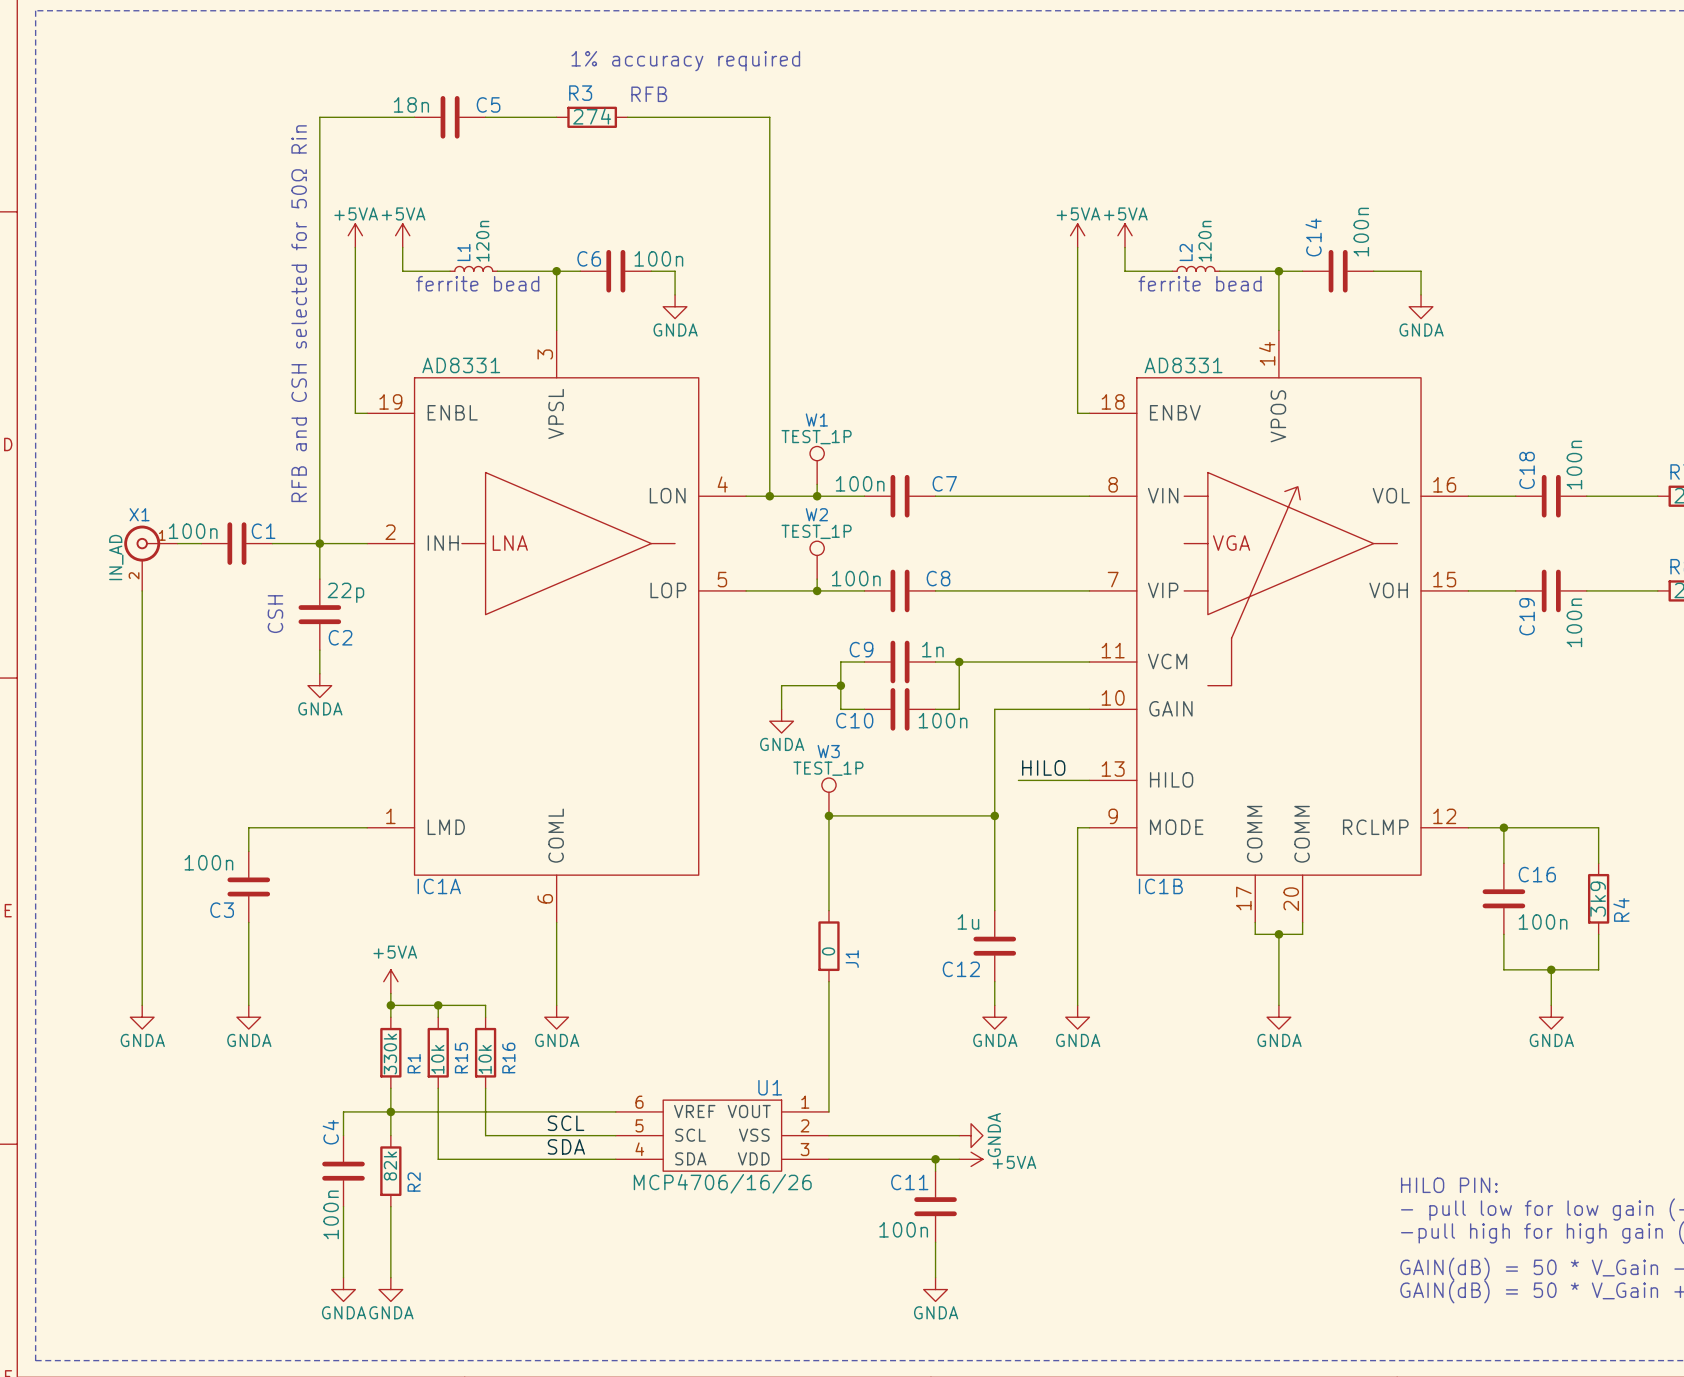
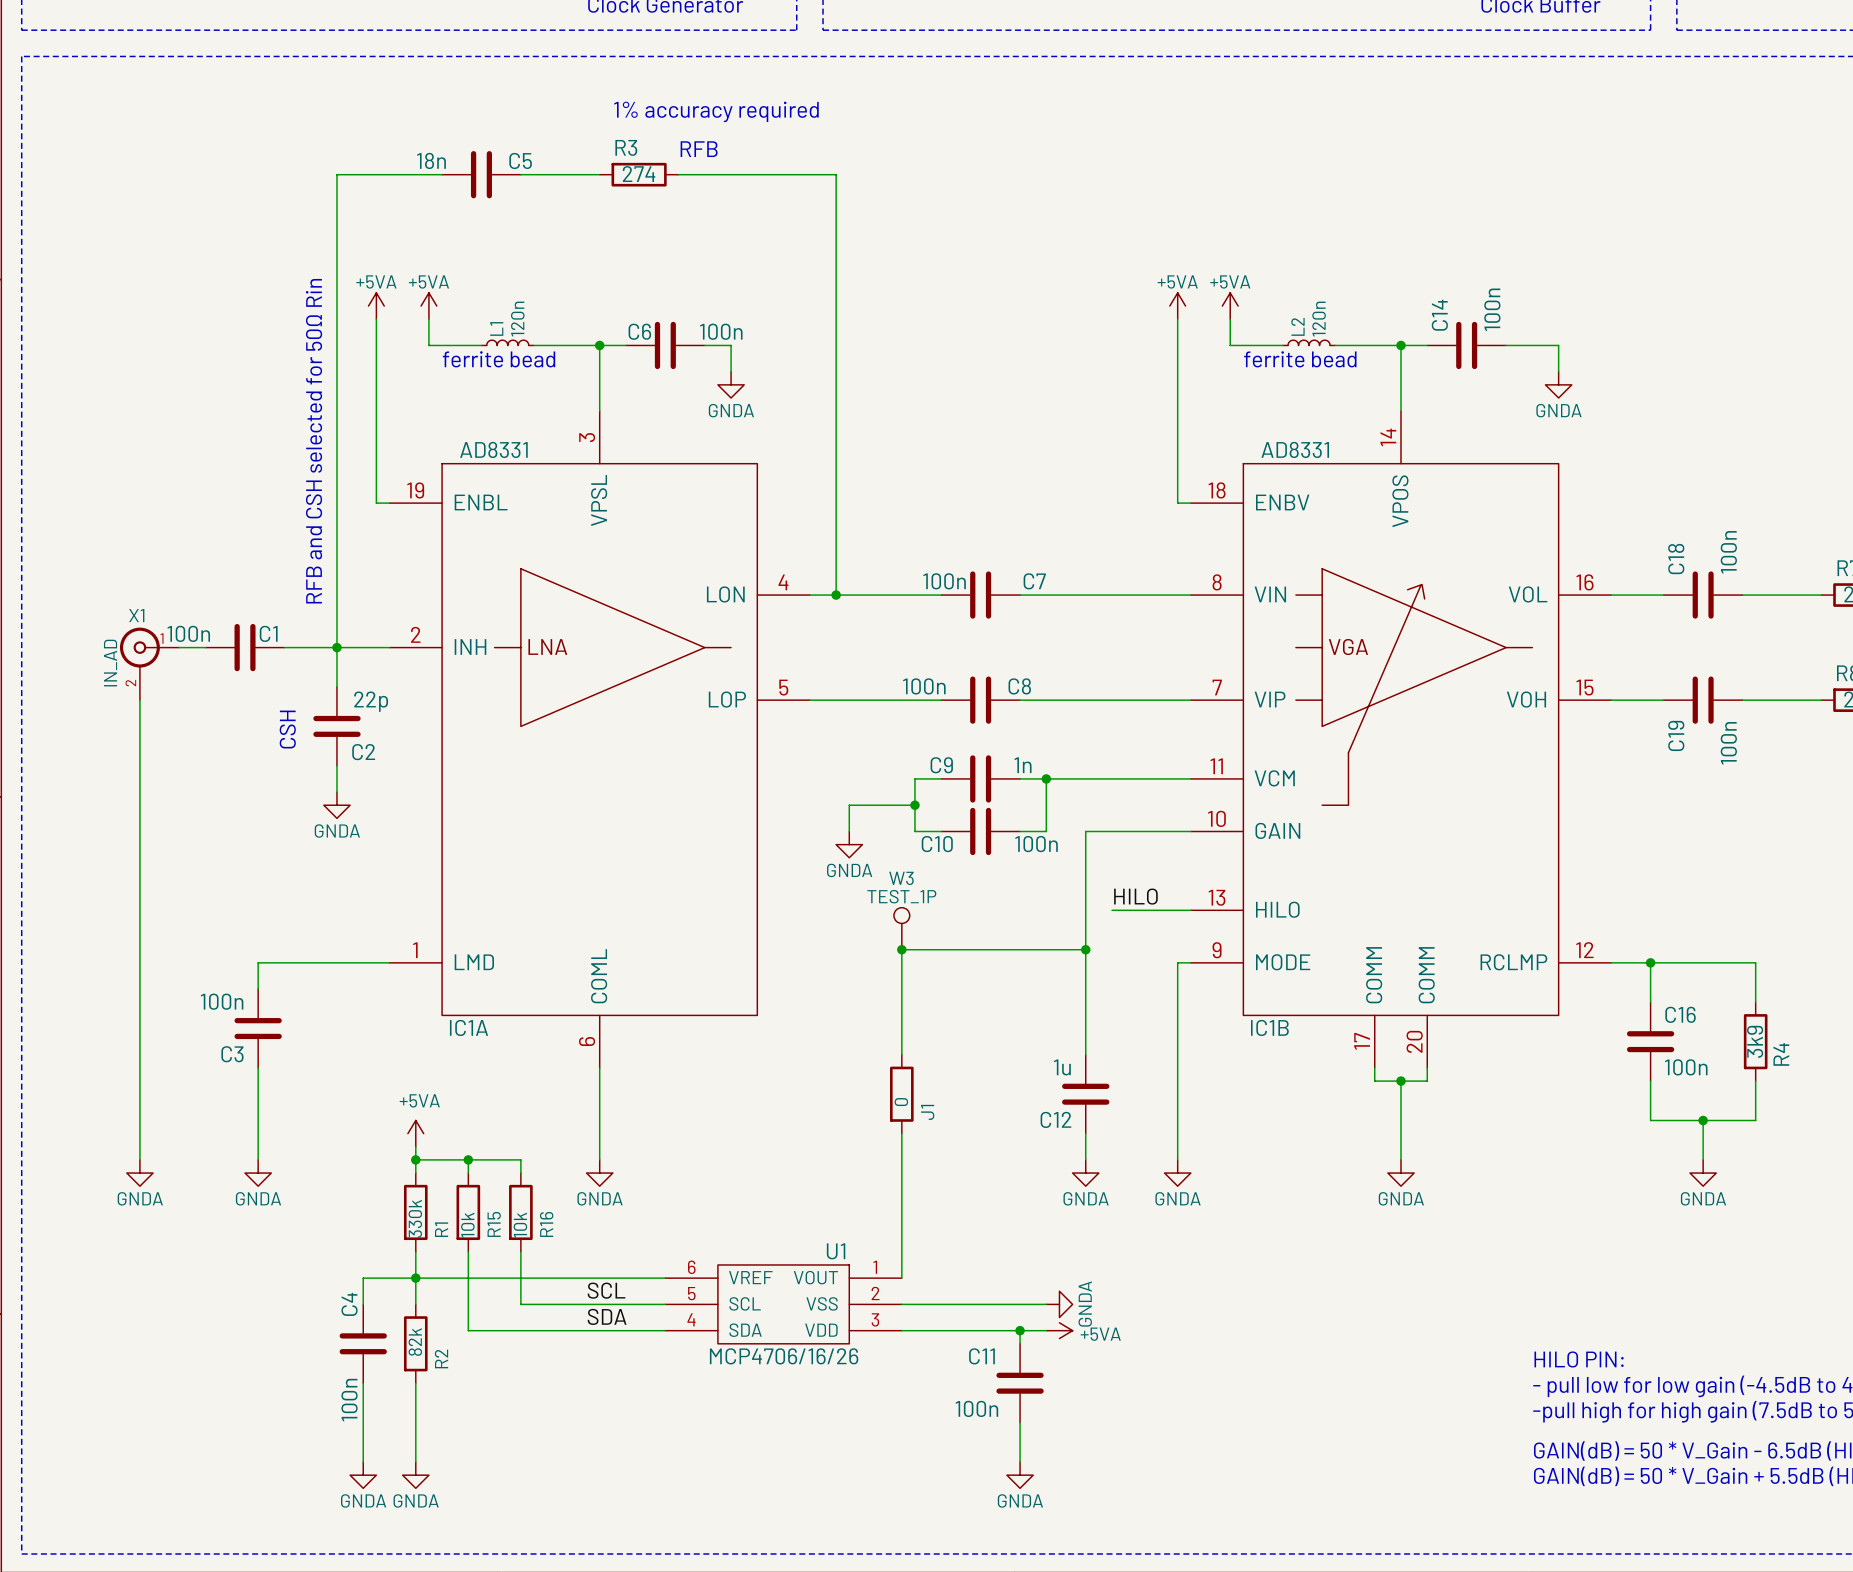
W1: TEST_1P (817, 465) -> none
wire: (817, 484) (817, 496) -> none
junction: (817, 496) -> none
W2: TEST_1P (817, 560) -> none
wire: (817, 579) (817, 590) -> none
junction: (817, 590) -> none

